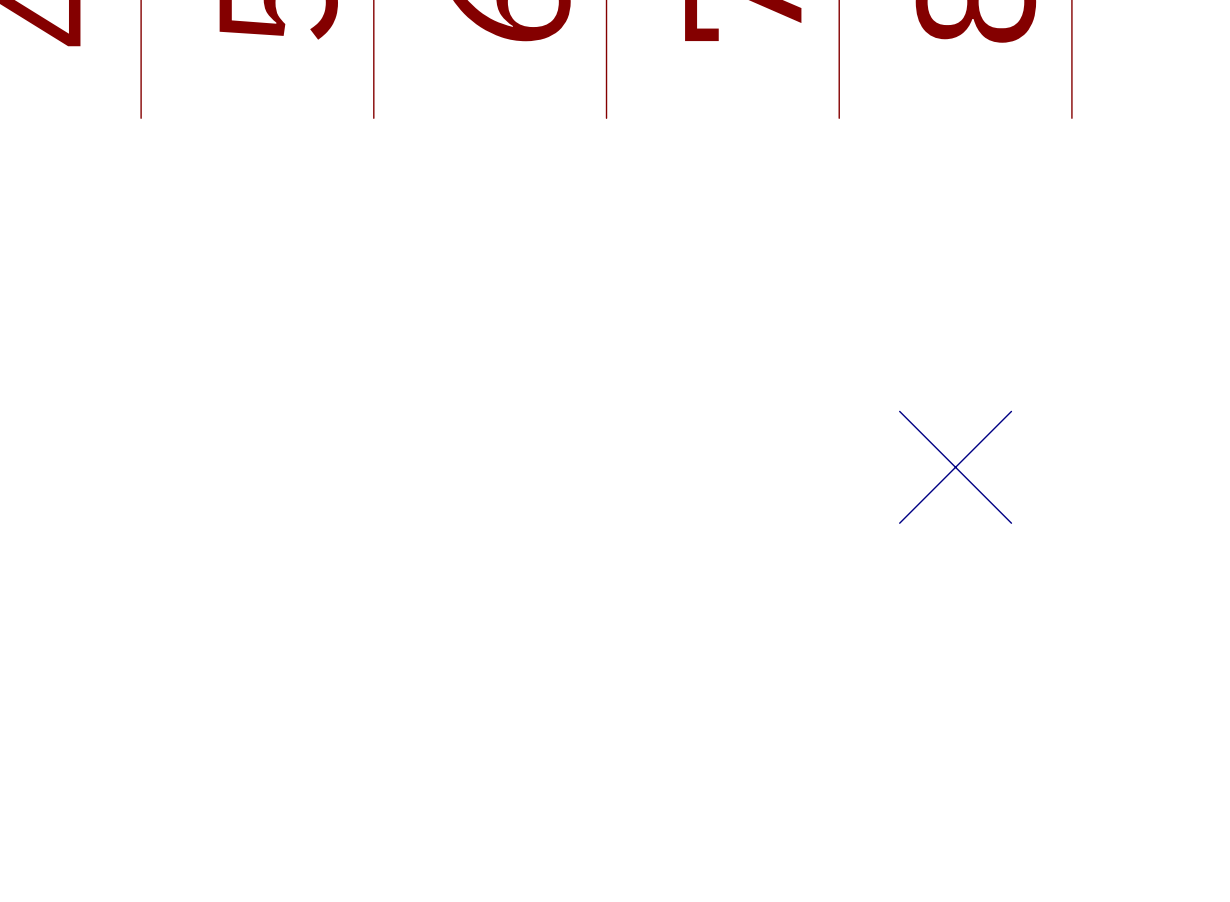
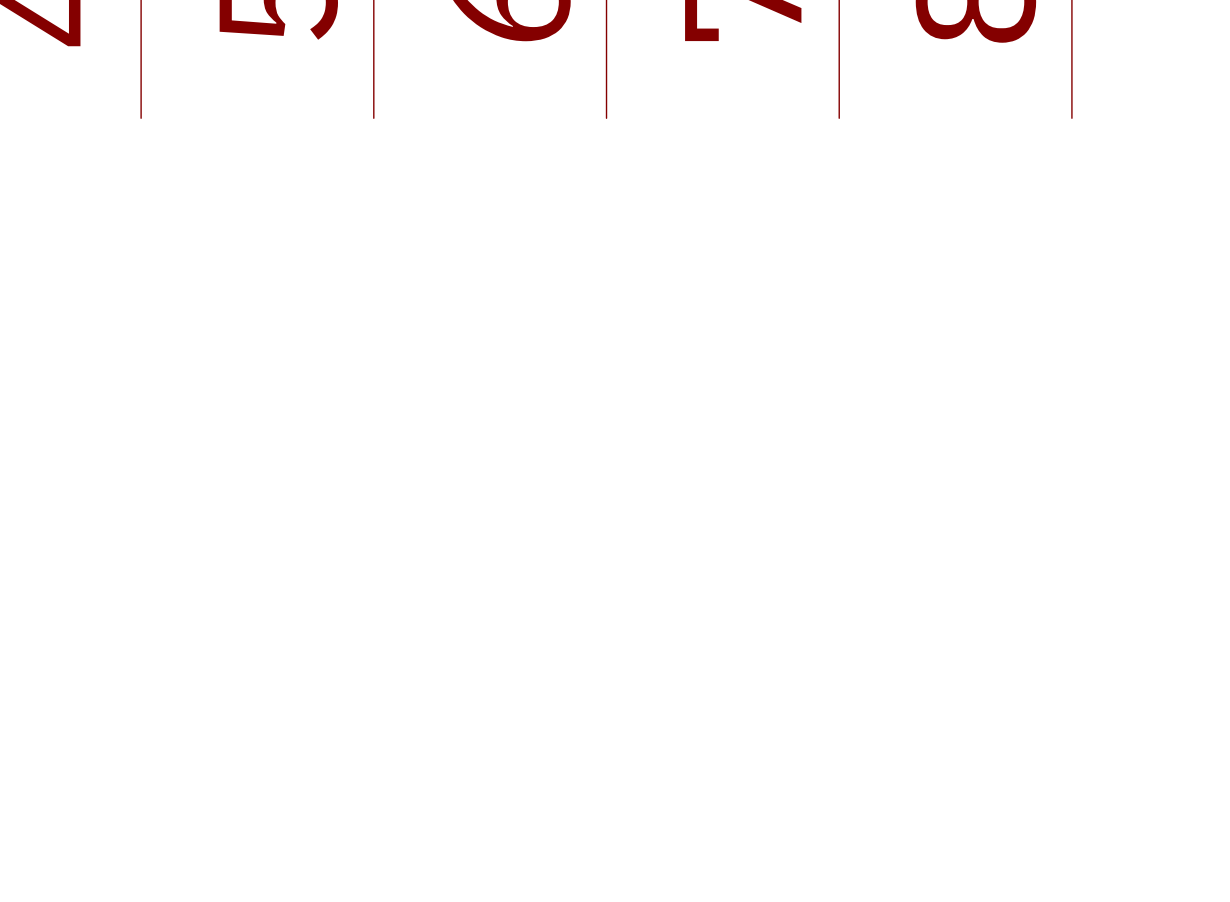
no-connect mark: (955, 467) -> none

